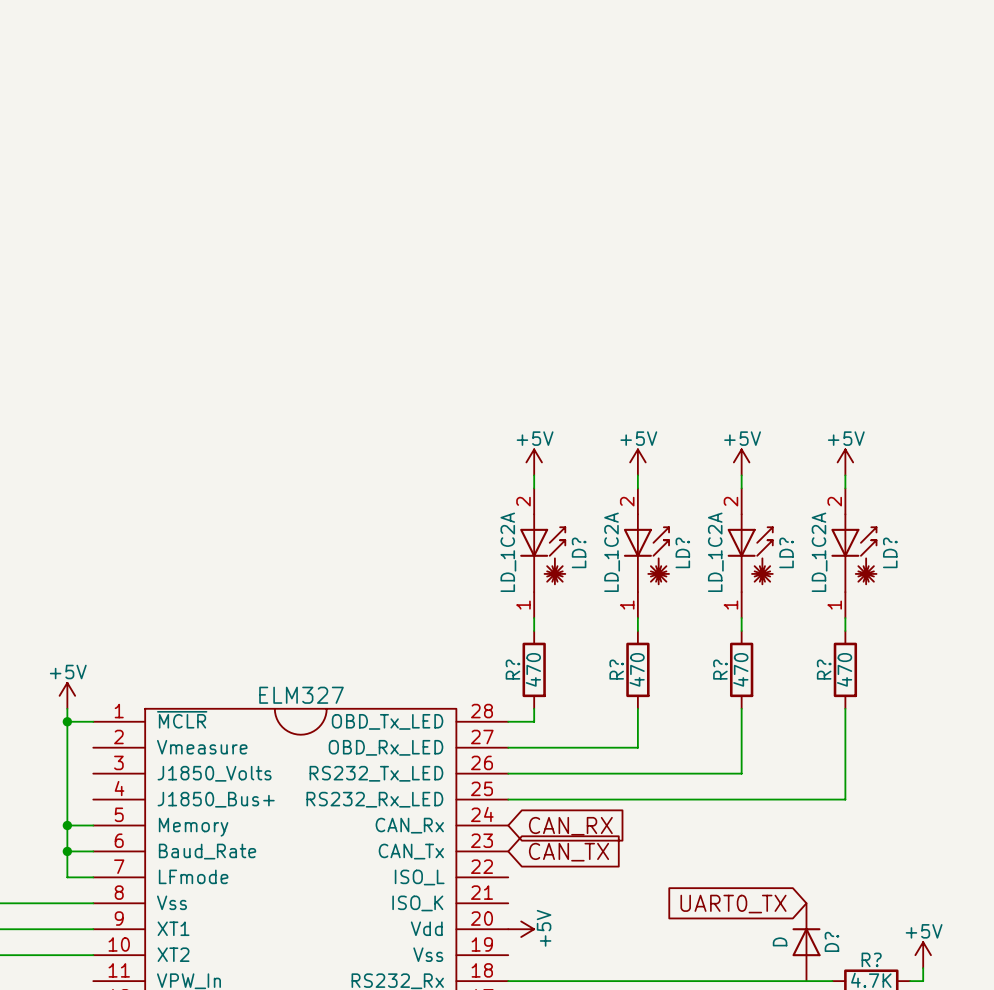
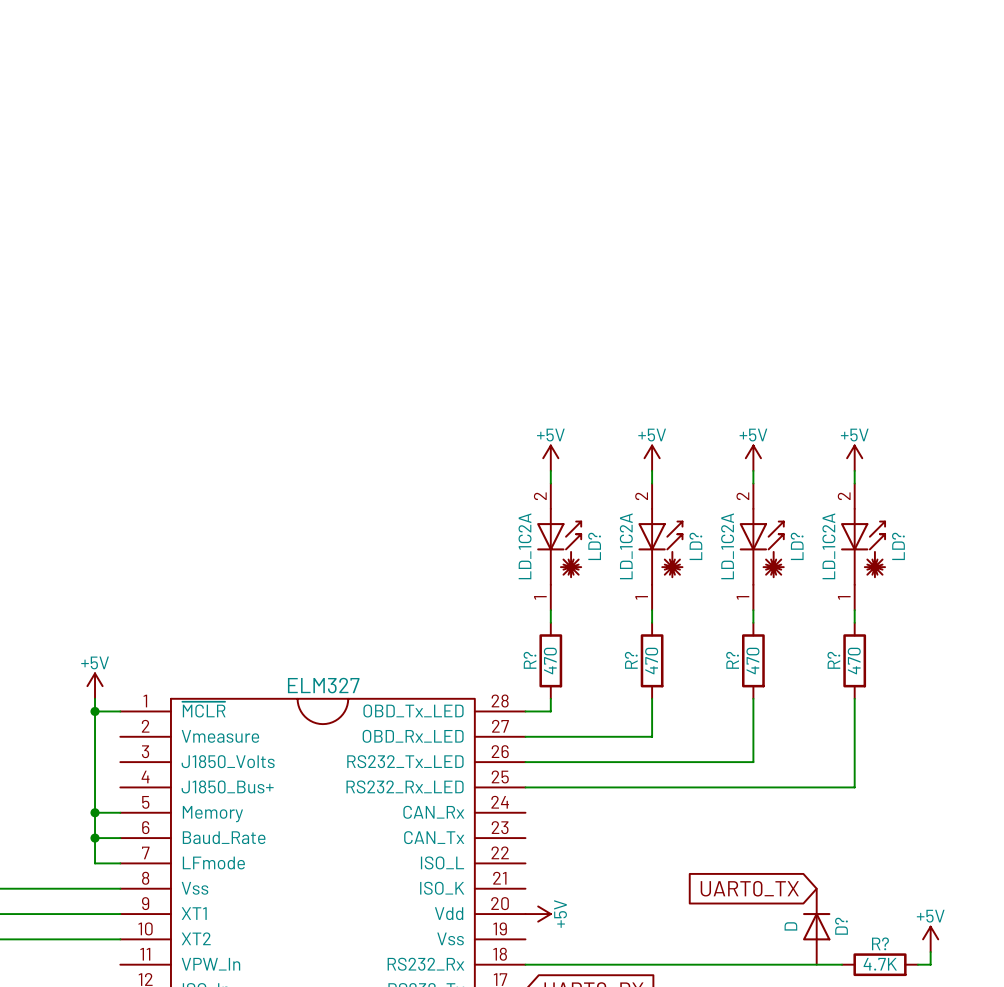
global label: CAN_RX (570, 826) -> none
global label: CAN_TX (569, 852) -> none

